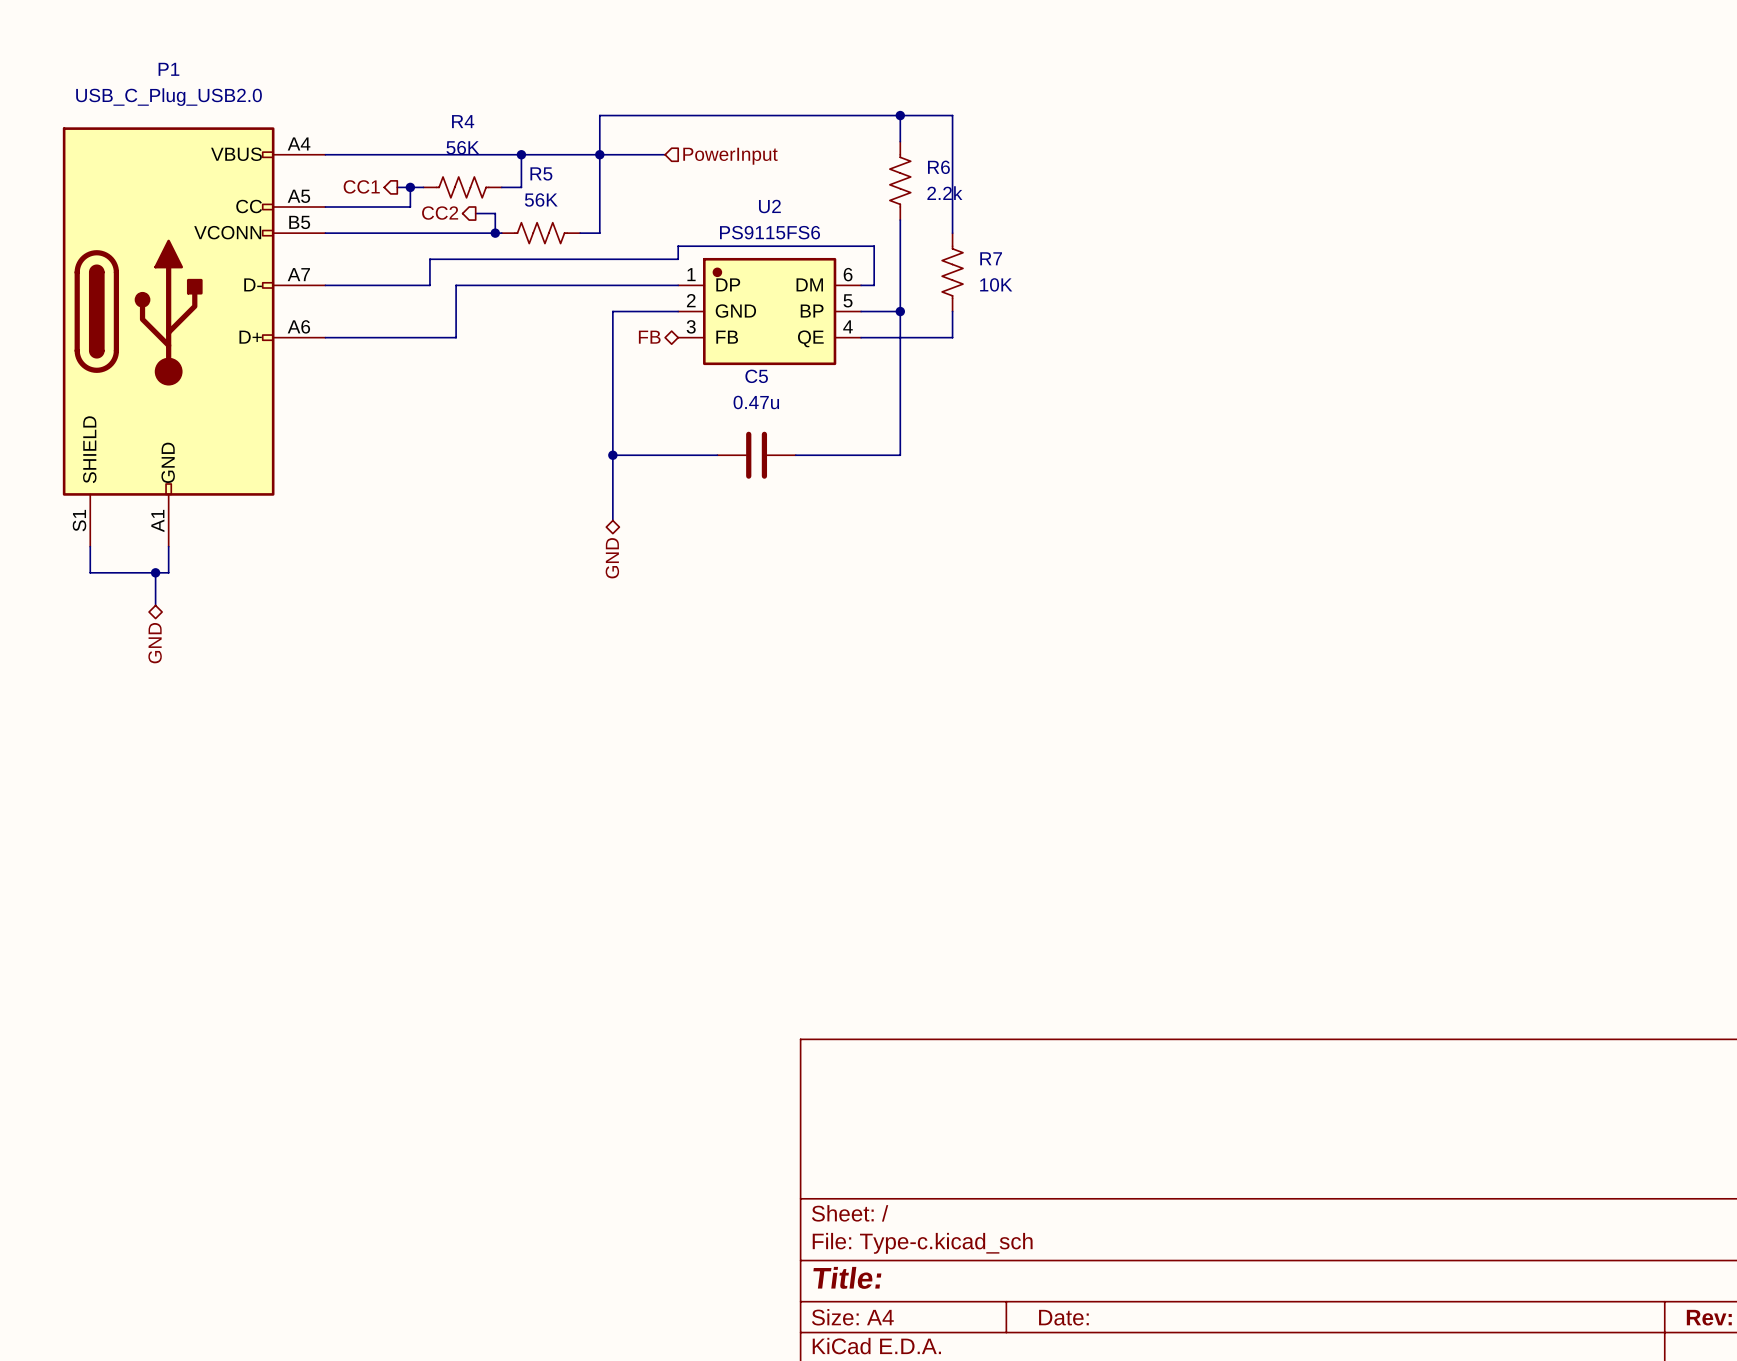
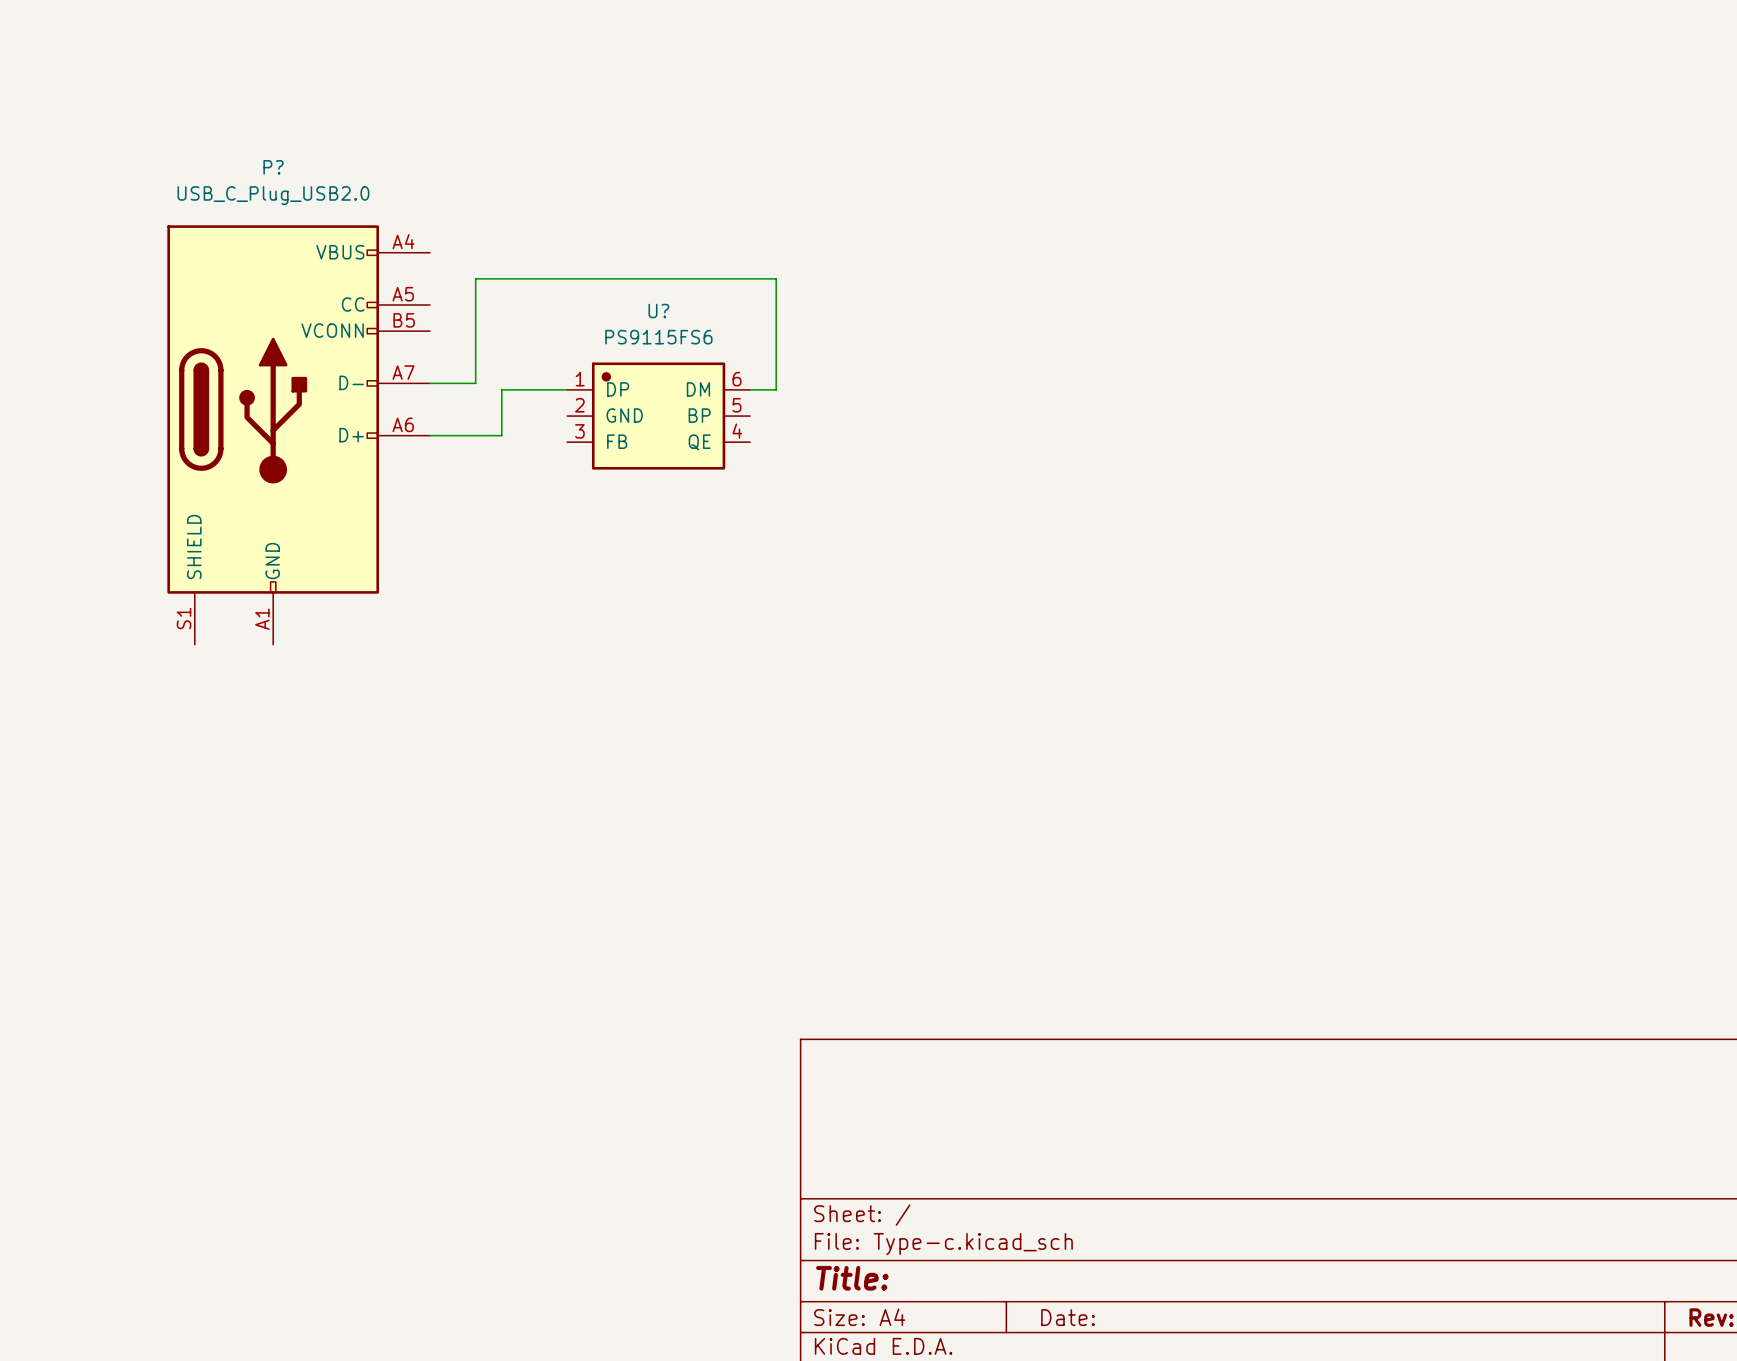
wire: (900, 115) (900, 141) -> none
junction: (900, 115) -> none
wire: (325, 154) (665, 154) -> none
wire: (521, 154) (521, 187) (501, 187) -> none
junction: (521, 154) -> none
junction: (599, 154) -> none
hierarchical label: PowerInput (730, 156) -> none
R6: 2.2k (900, 180) -> none
hierarchical label: CC1 (361, 186) -> none
wire: (397, 187) (423, 187) -> none
wire: (410, 187) (410, 207) (325, 207) -> none
junction: (410, 187) -> none
R4: 56K (462, 187) -> none
hierarchical label: CC2 (440, 213) -> none
wire: (475, 213) (495, 213) (495, 233) -> none
wire: (900, 220) (900, 455) (795, 455) -> none
wire: (325, 233) (501, 233) -> none
junction: (495, 233) -> none
R5: 56K (541, 233) -> none
wire: (580, 233) (599, 233) (599, 115) (952, 115) (952, 233) -> none
R7: 10K (952, 272) -> none
wire: (325, 285) (429, 285) (429, 259) (678, 259) (678, 246) (874, 246) (874, 285) (861, 285) -> none
wire: (678, 285) (456, 285) (456, 337) (325, 337) -> none
wire: (678, 311) (612, 311) (612, 520) -> none
U2: PS9115FS6 (769, 311) -> none
wire: (861, 311) (900, 311) -> none
junction: (900, 311) -> none
wire: (952, 311) (952, 337) (861, 337) -> none
P1: USB_C_Plug_USB2.0 (194, 337) -> none
hierarchical label: FB (649, 337) -> none
wire: none -> (429, 383) (475, 383) (475, 278) (776, 278) (776, 389) (750, 389)
wire: none -> (567, 389) (501, 389) (501, 435) (429, 435)
U?: none -> PS9115FS6 (658, 416)
P?: none -> USB_C_Plug_USB2.0 (298, 434)
junction: (612, 455) -> none
C5: 0.47u (756, 455) -> none
wire: (90, 546) (90, 572) (168, 572) (168, 546) -> none
hierarchical label: GND (612, 558) -> none
wire: (155, 572) (155, 605) -> none
junction: (155, 572) -> none
hierarchical label: GND (155, 643) -> none

